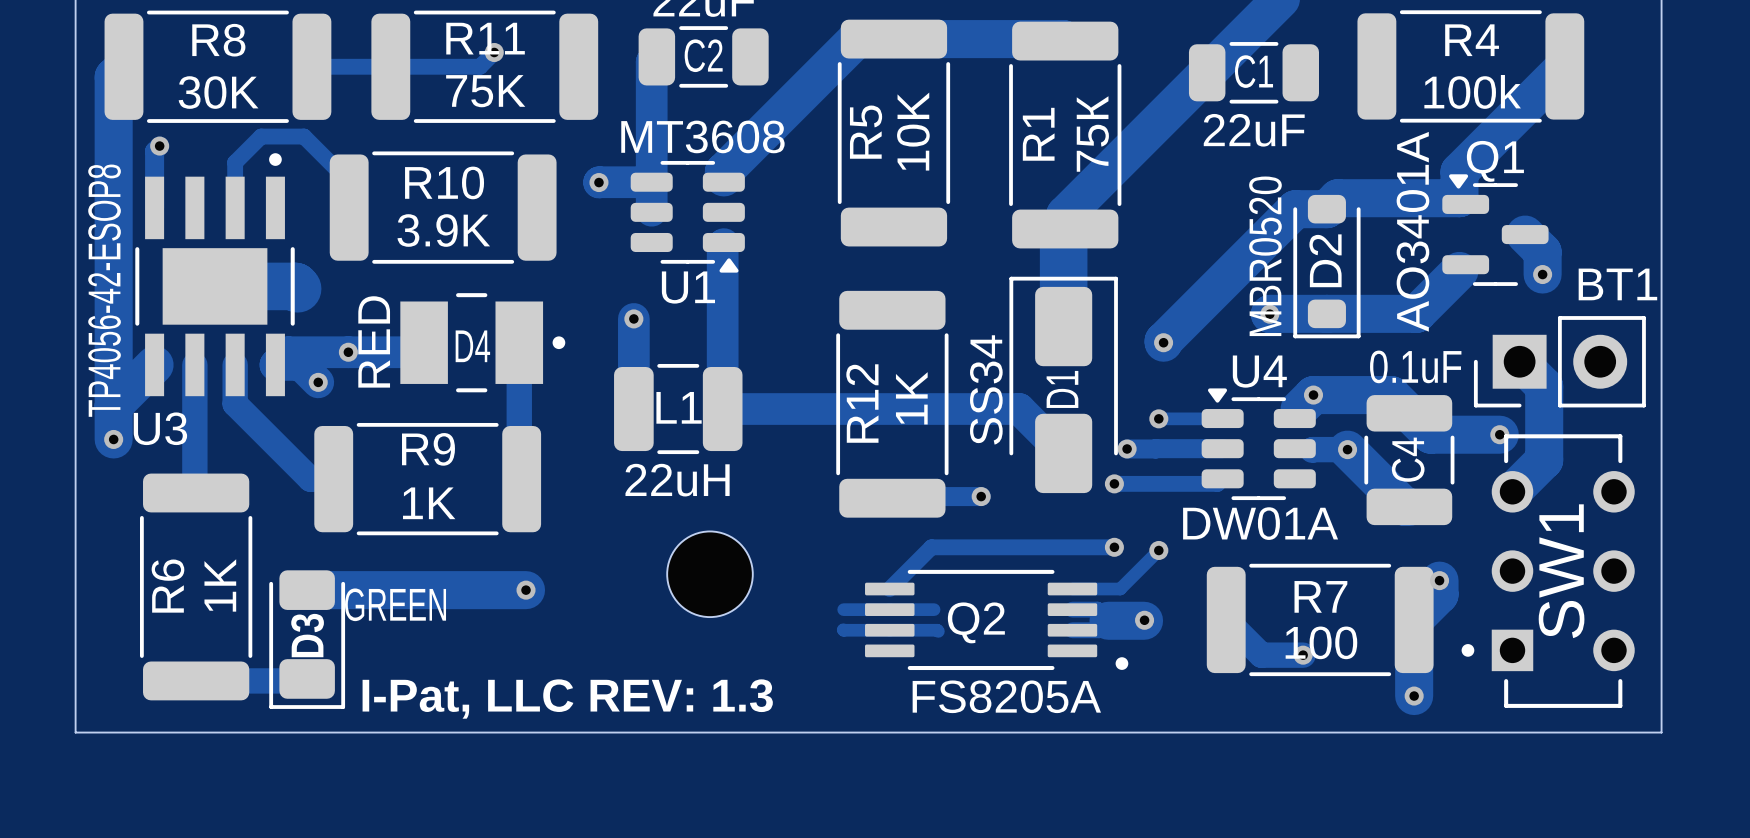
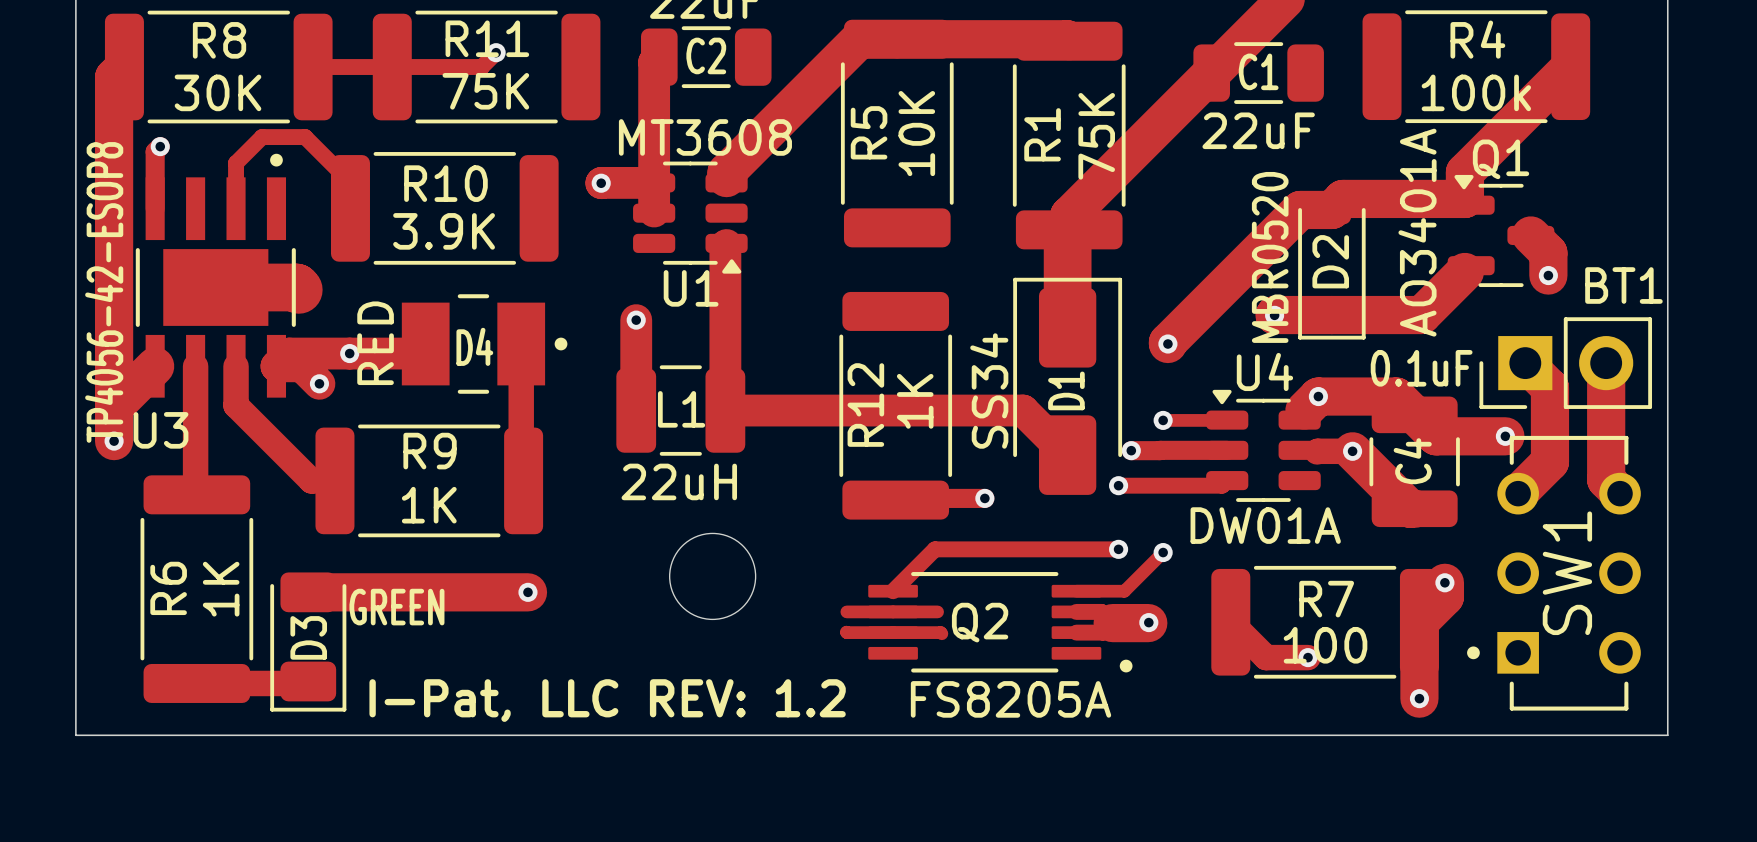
track: none -> (1606, 363) (1606, 479) (1620, 493)
text: I-Pat, LLC REV: 1.3 (567, 699) -> I-Pat, LLC REV: 1.2 (607, 700)

